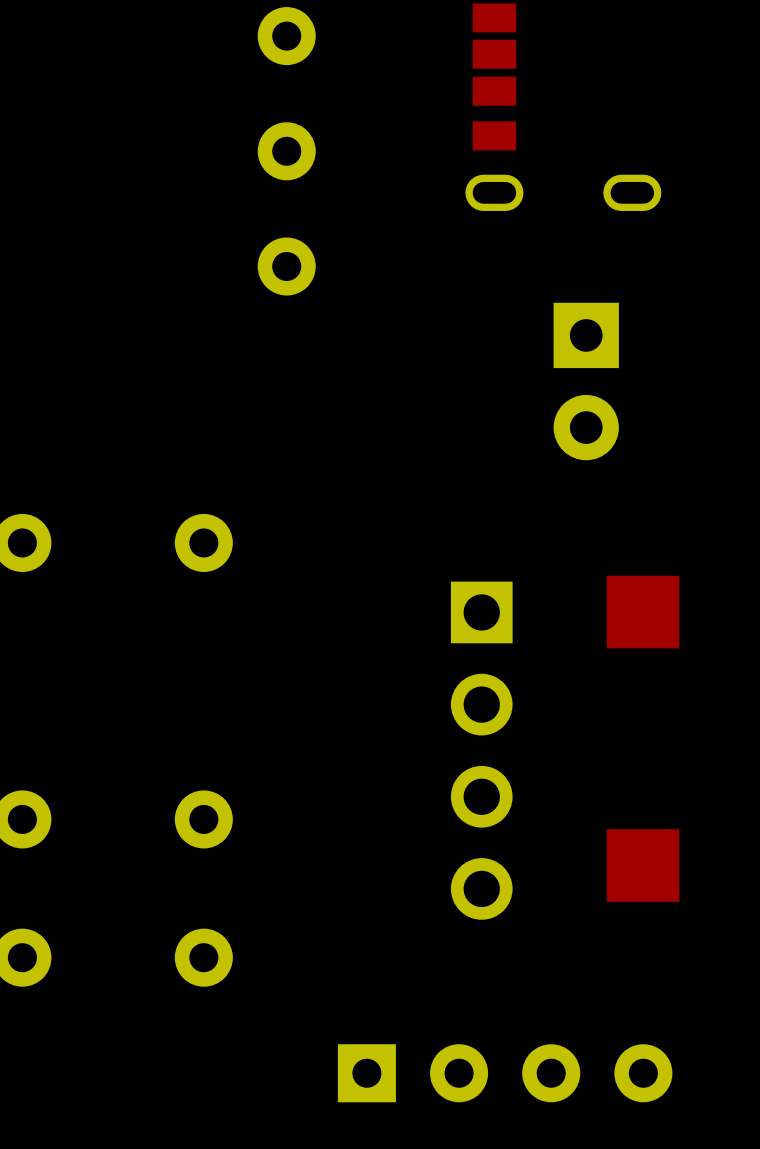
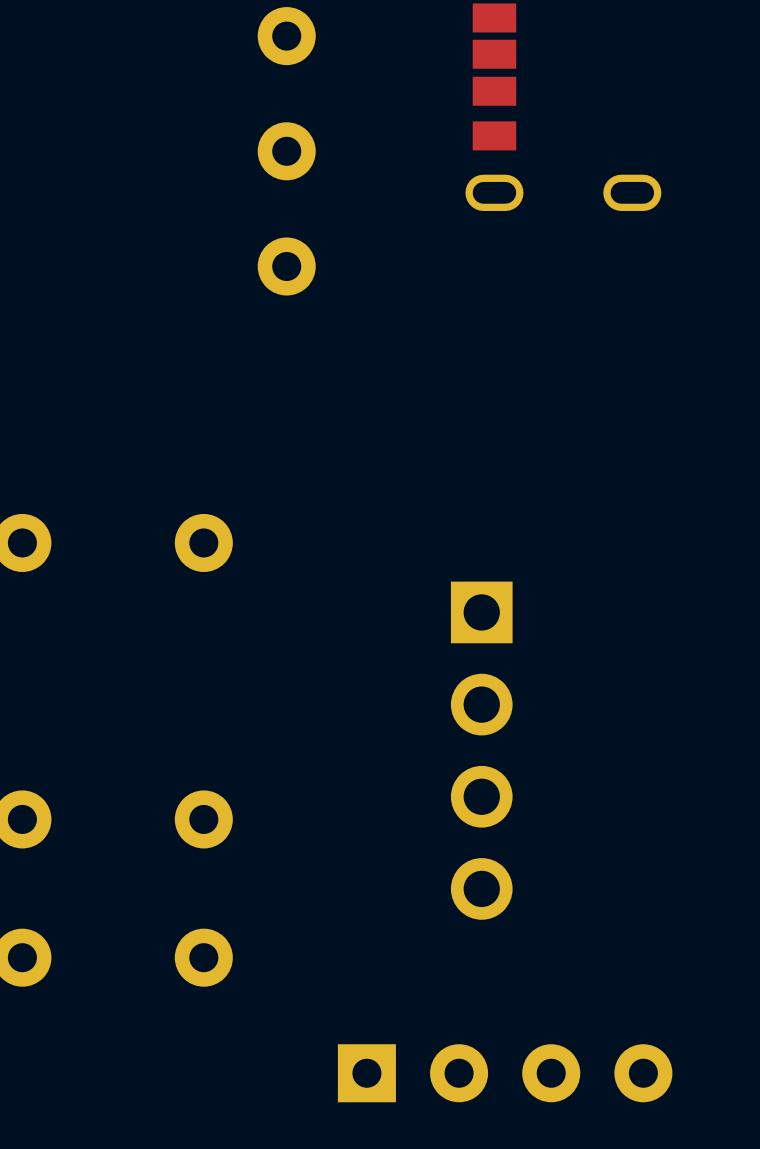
part: (586, 381) -> none
part: (643, 612) -> none
part: (643, 865) -> none

